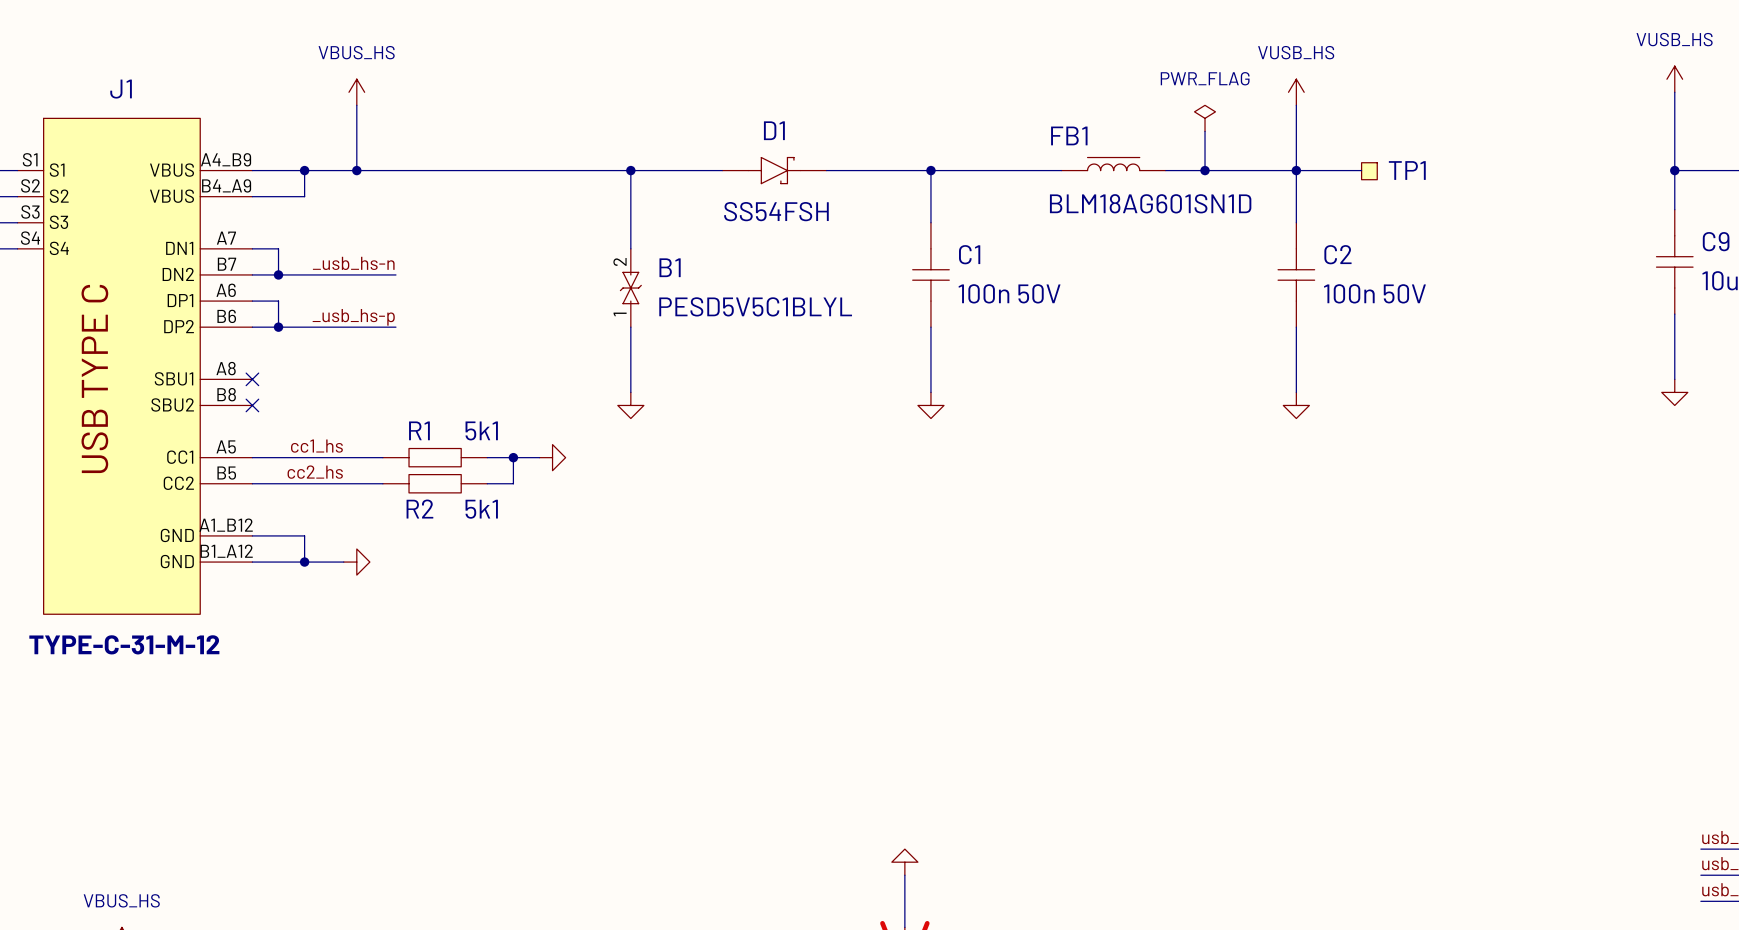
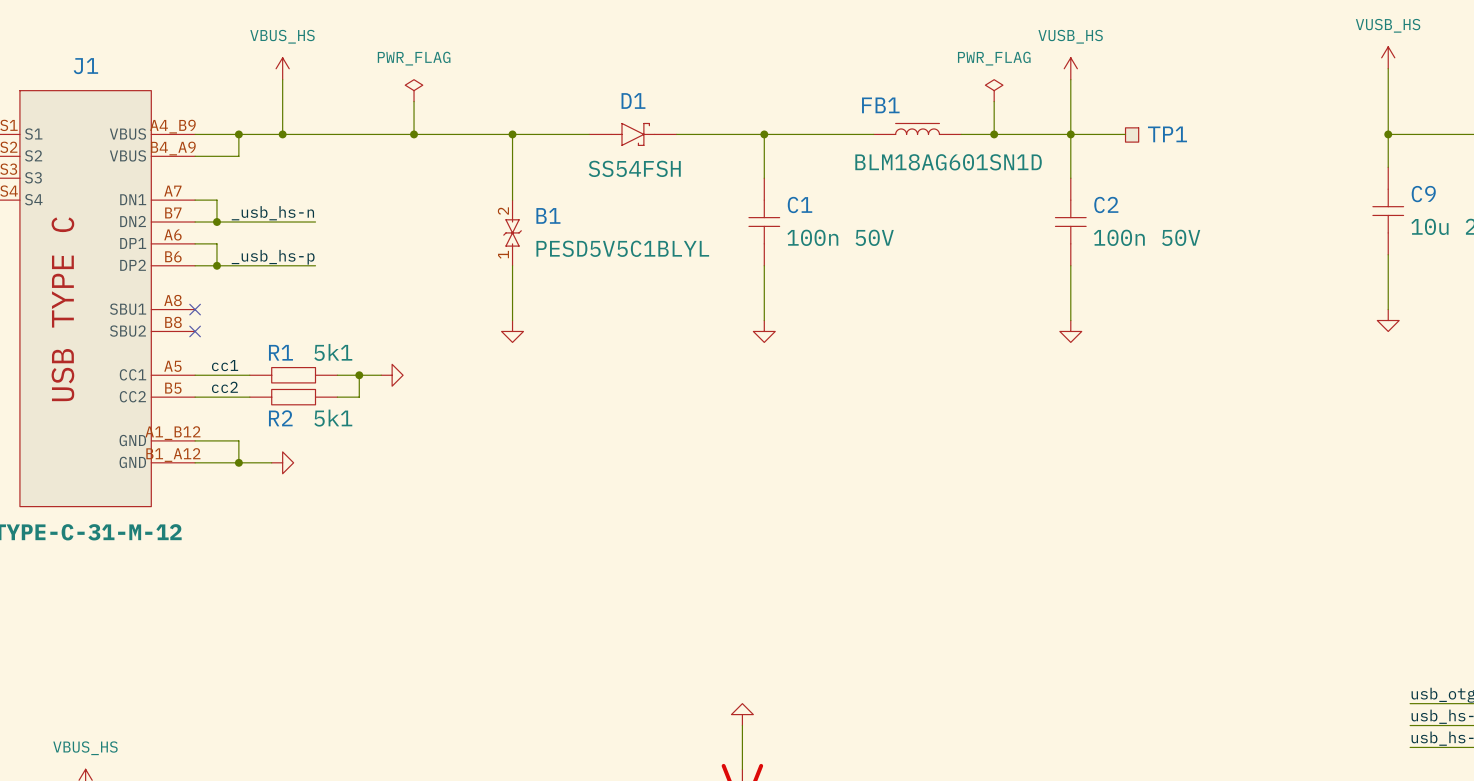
power symbol: none -> PWR_FLAG (414, 90)
wire: none -> (414, 101) (414, 134)
junction: none -> (414, 134)
label: cc1_hs (316, 446) -> cc1 (225, 365)
wire: (317, 457) (382, 457) -> none
R1 position: (435, 457) -> (293, 375)
junction: none -> (359, 375)
wire: (487, 457) (539, 457) -> (337, 375) (381, 375)
wire: (513, 457) (513, 483) (487, 483) -> (359, 375) (359, 397) (337, 397)
junction: (513, 457) -> none
power symbol position: (552, 457) -> (392, 375)
label: cc2_hs (315, 472) -> cc2 (224, 387)
wire: (317, 483) (382, 483) -> none
R2 position: (435, 483) -> (293, 397)

